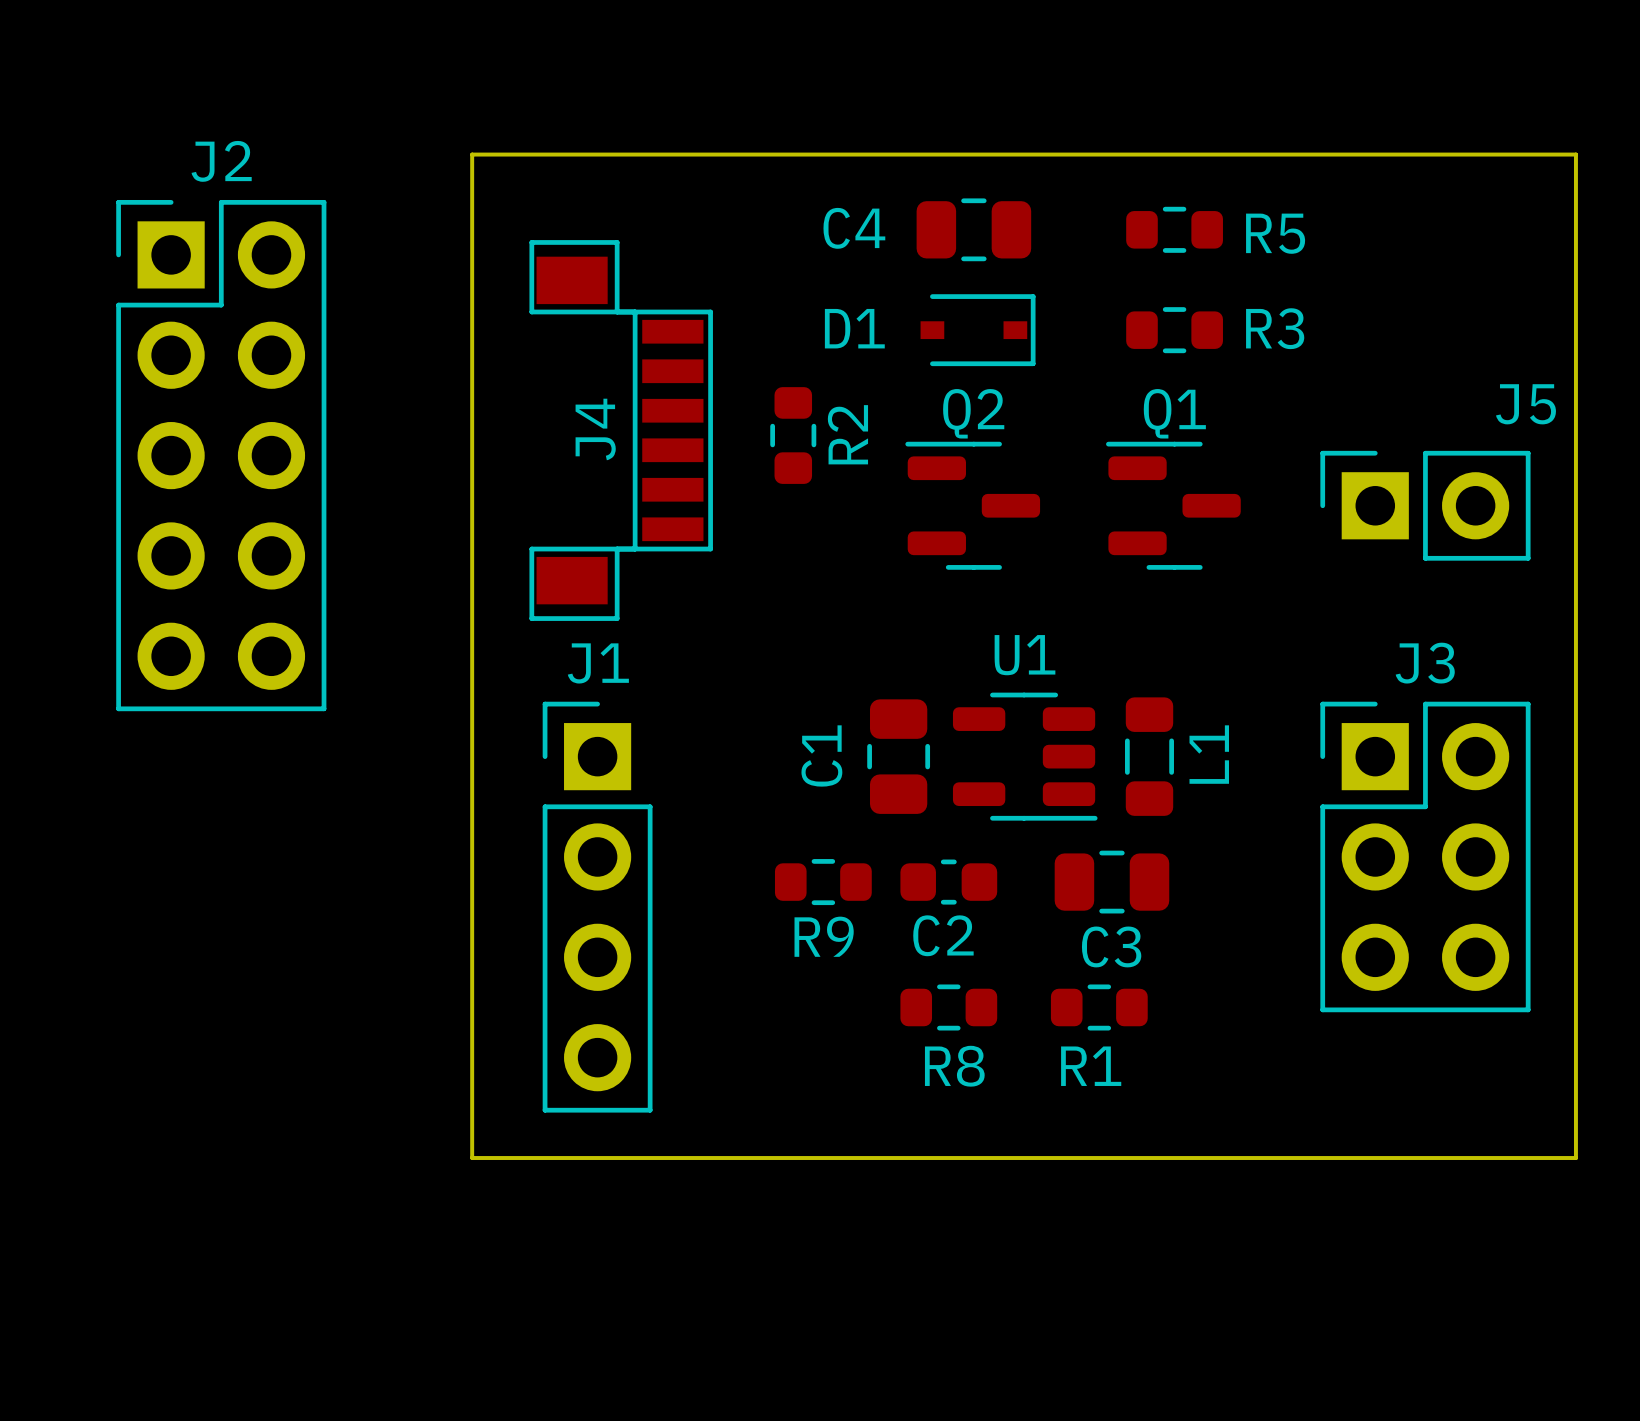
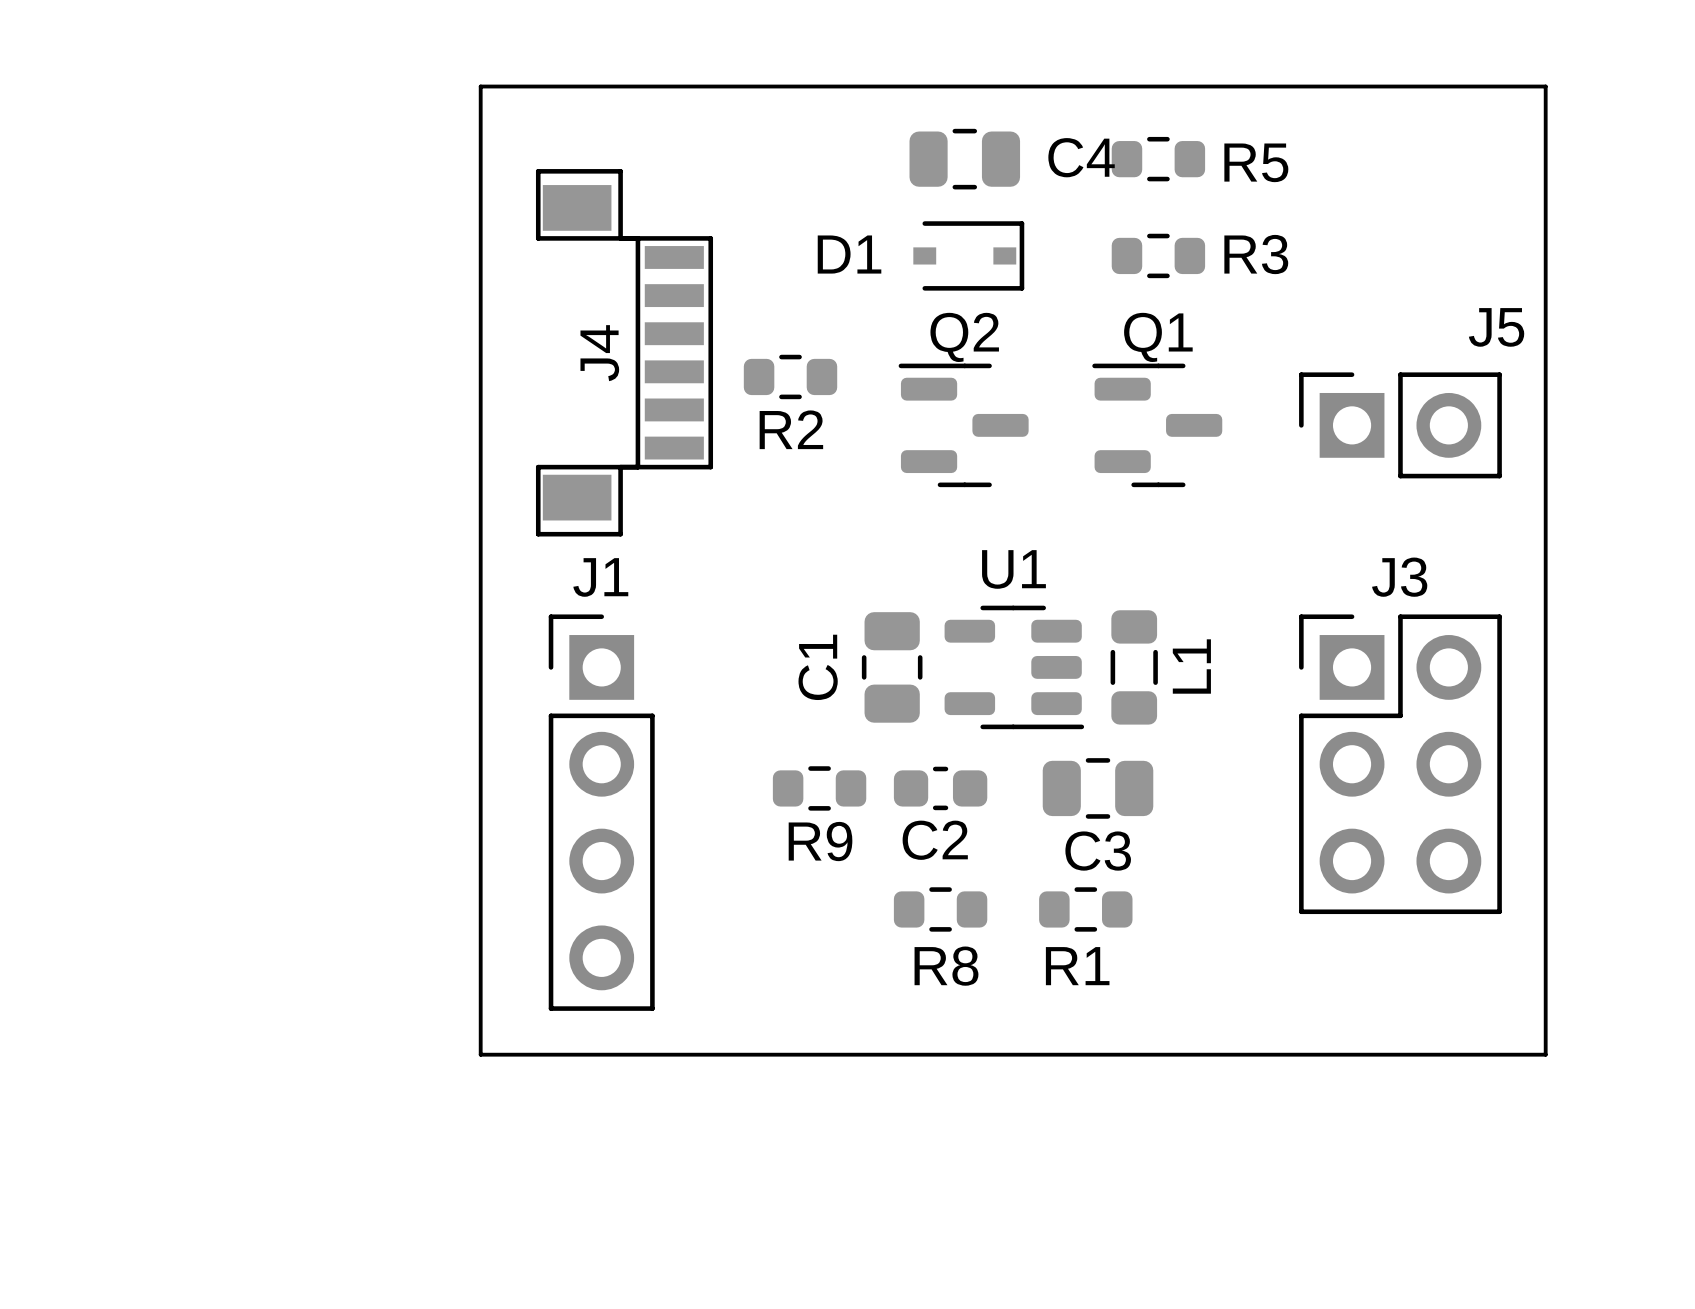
C4 name position: C4 (854, 228) -> C4 (1081, 157)
R2 rotation: 0° (793, 435) -> 90° clockwise (790, 376)
J2: (221, 455) -> none

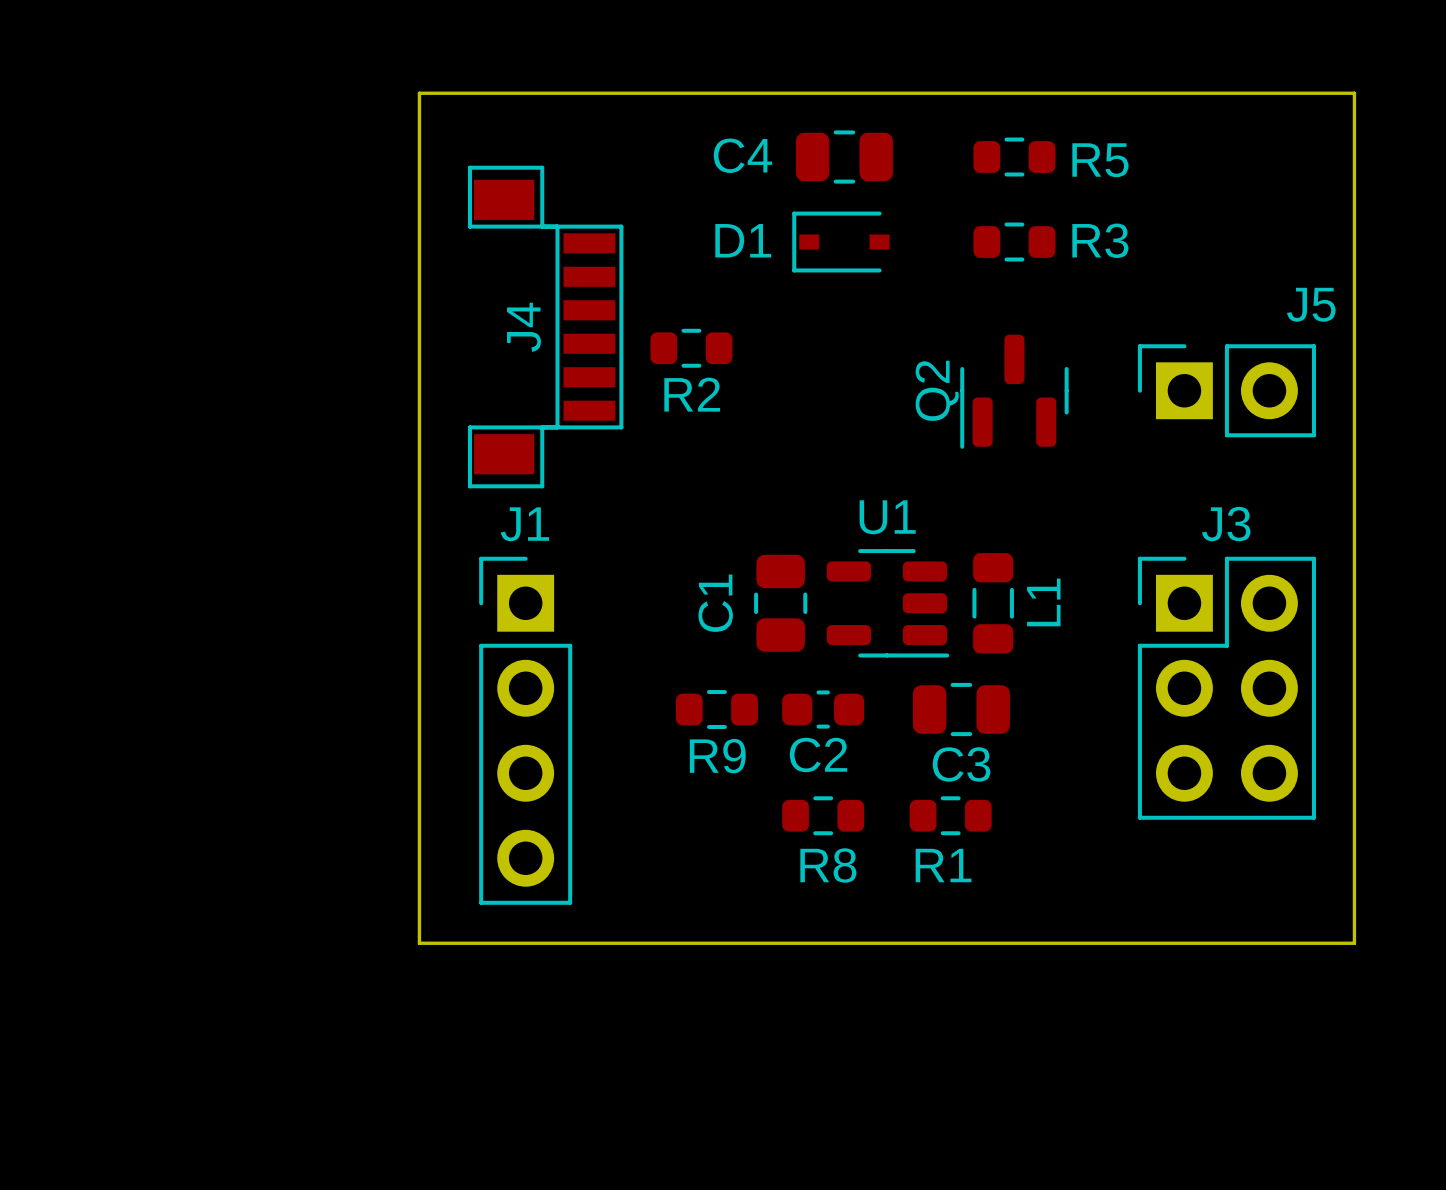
C4 name position: C4 (1081, 157) -> C4 (742, 155)
D1 rotation: 0° (968, 255) -> 180° (840, 242)
Q2 rotation: 0° (963, 425) -> 90° counterclockwise (1014, 391)
Q2 position: (963, 425) -> (1014, 391)
Q1: (1157, 425) -> none

